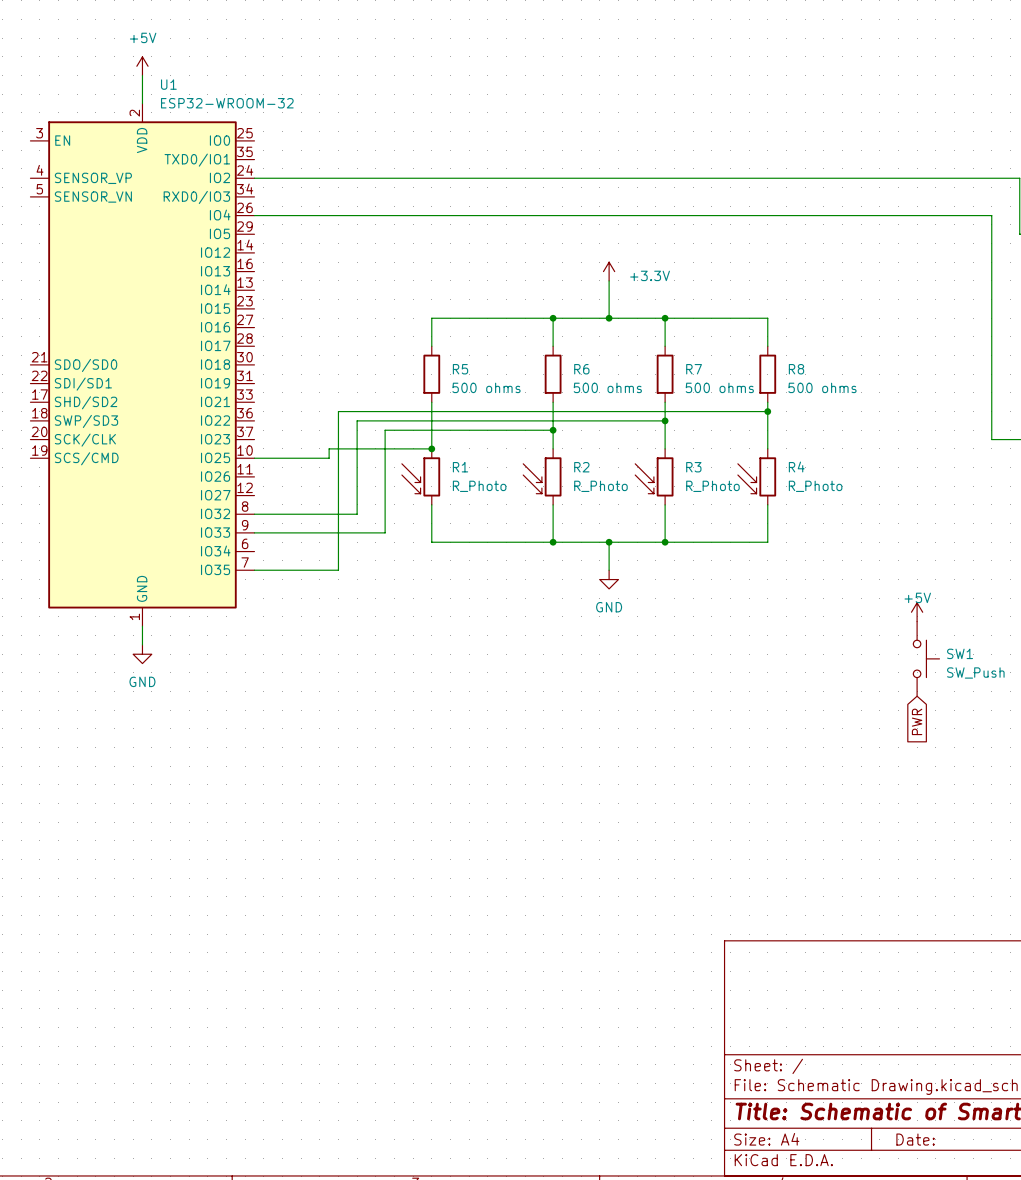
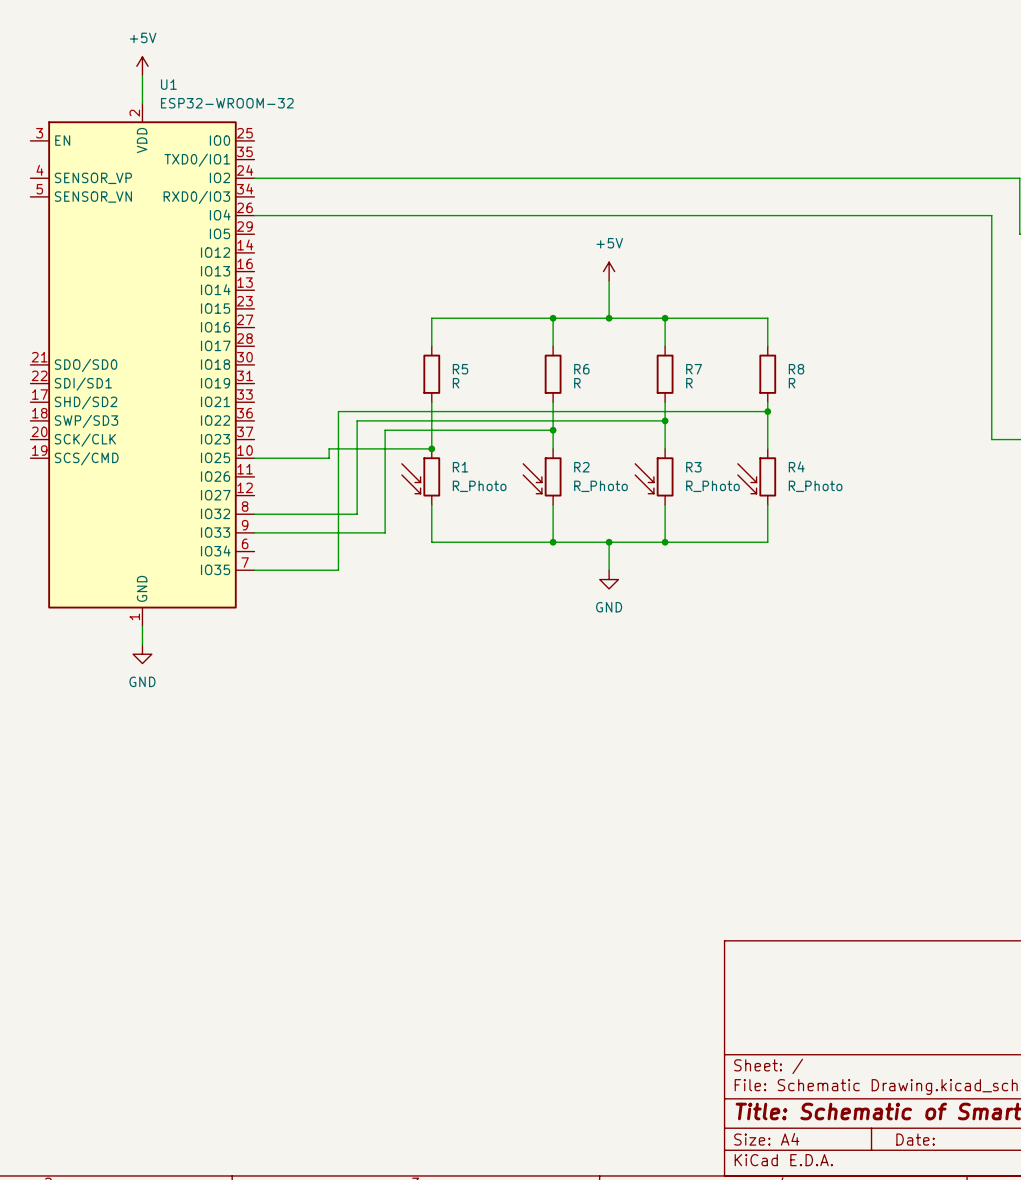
power symbol: +3.3V (609, 271) -> +5V (609, 271)
R5 value: 500 ohms (486, 387) -> R (456, 383)
R6 value: 500 ohms (607, 387) -> R (577, 383)
R7 value: 500 ohms (719, 387) -> R (689, 383)
R8 value: 500 ohms (822, 387) -> R (792, 383)
power symbol: +5V (917, 612) -> none
SW1: SW_Push (926, 658) -> none
global label: PWR (917, 721) -> none

